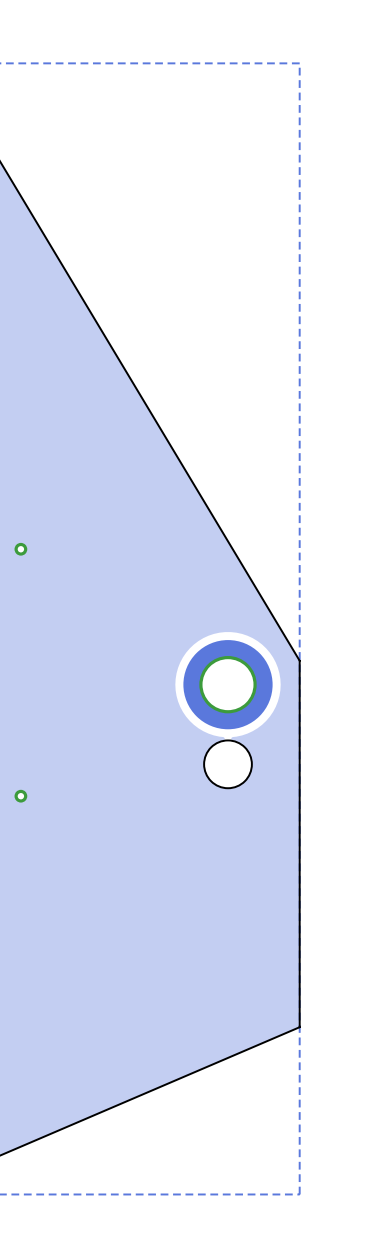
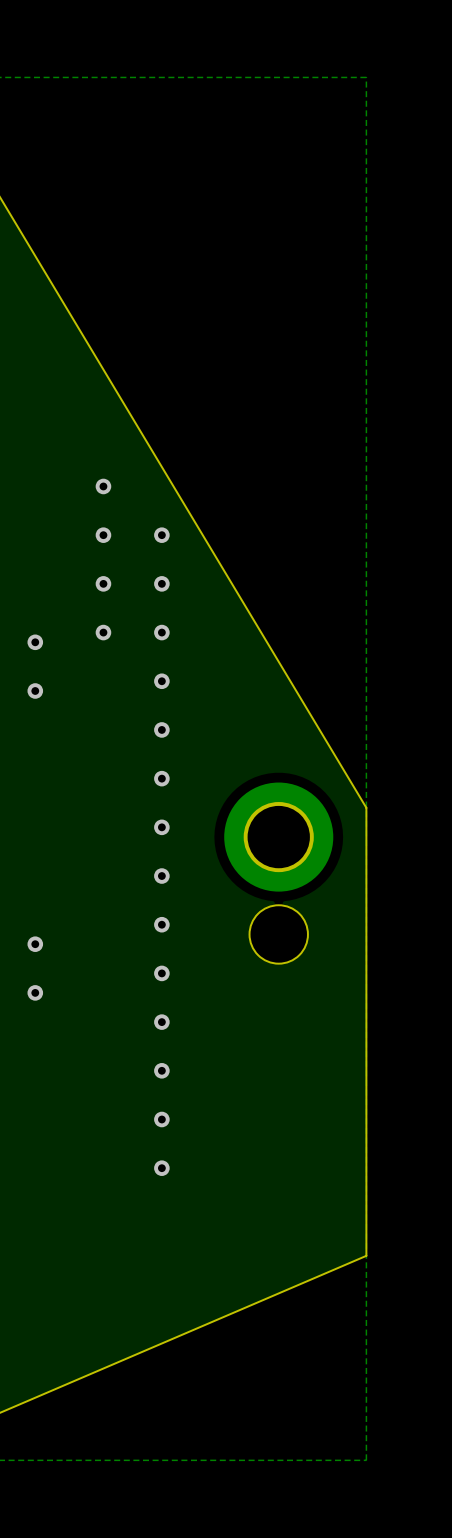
via: none -> (103, 486)
via: none -> (103, 535)
via: none -> (161, 535)
via: none -> (103, 583)
via: none -> (161, 583)
via: none -> (103, 632)
via: none -> (161, 632)
via: none -> (35, 642)
via: (20, 549) -> none
via: none -> (161, 681)
via: none -> (35, 690)
via: none -> (161, 729)
via: none -> (161, 778)
via: none -> (161, 827)
via: none -> (161, 876)
via: none -> (161, 924)
via: none -> (35, 944)
via: (20, 796) -> none
via: none -> (161, 973)
via: none -> (35, 992)
via: none -> (161, 1022)
via: none -> (161, 1070)
via: none -> (161, 1119)
via: none -> (161, 1168)

